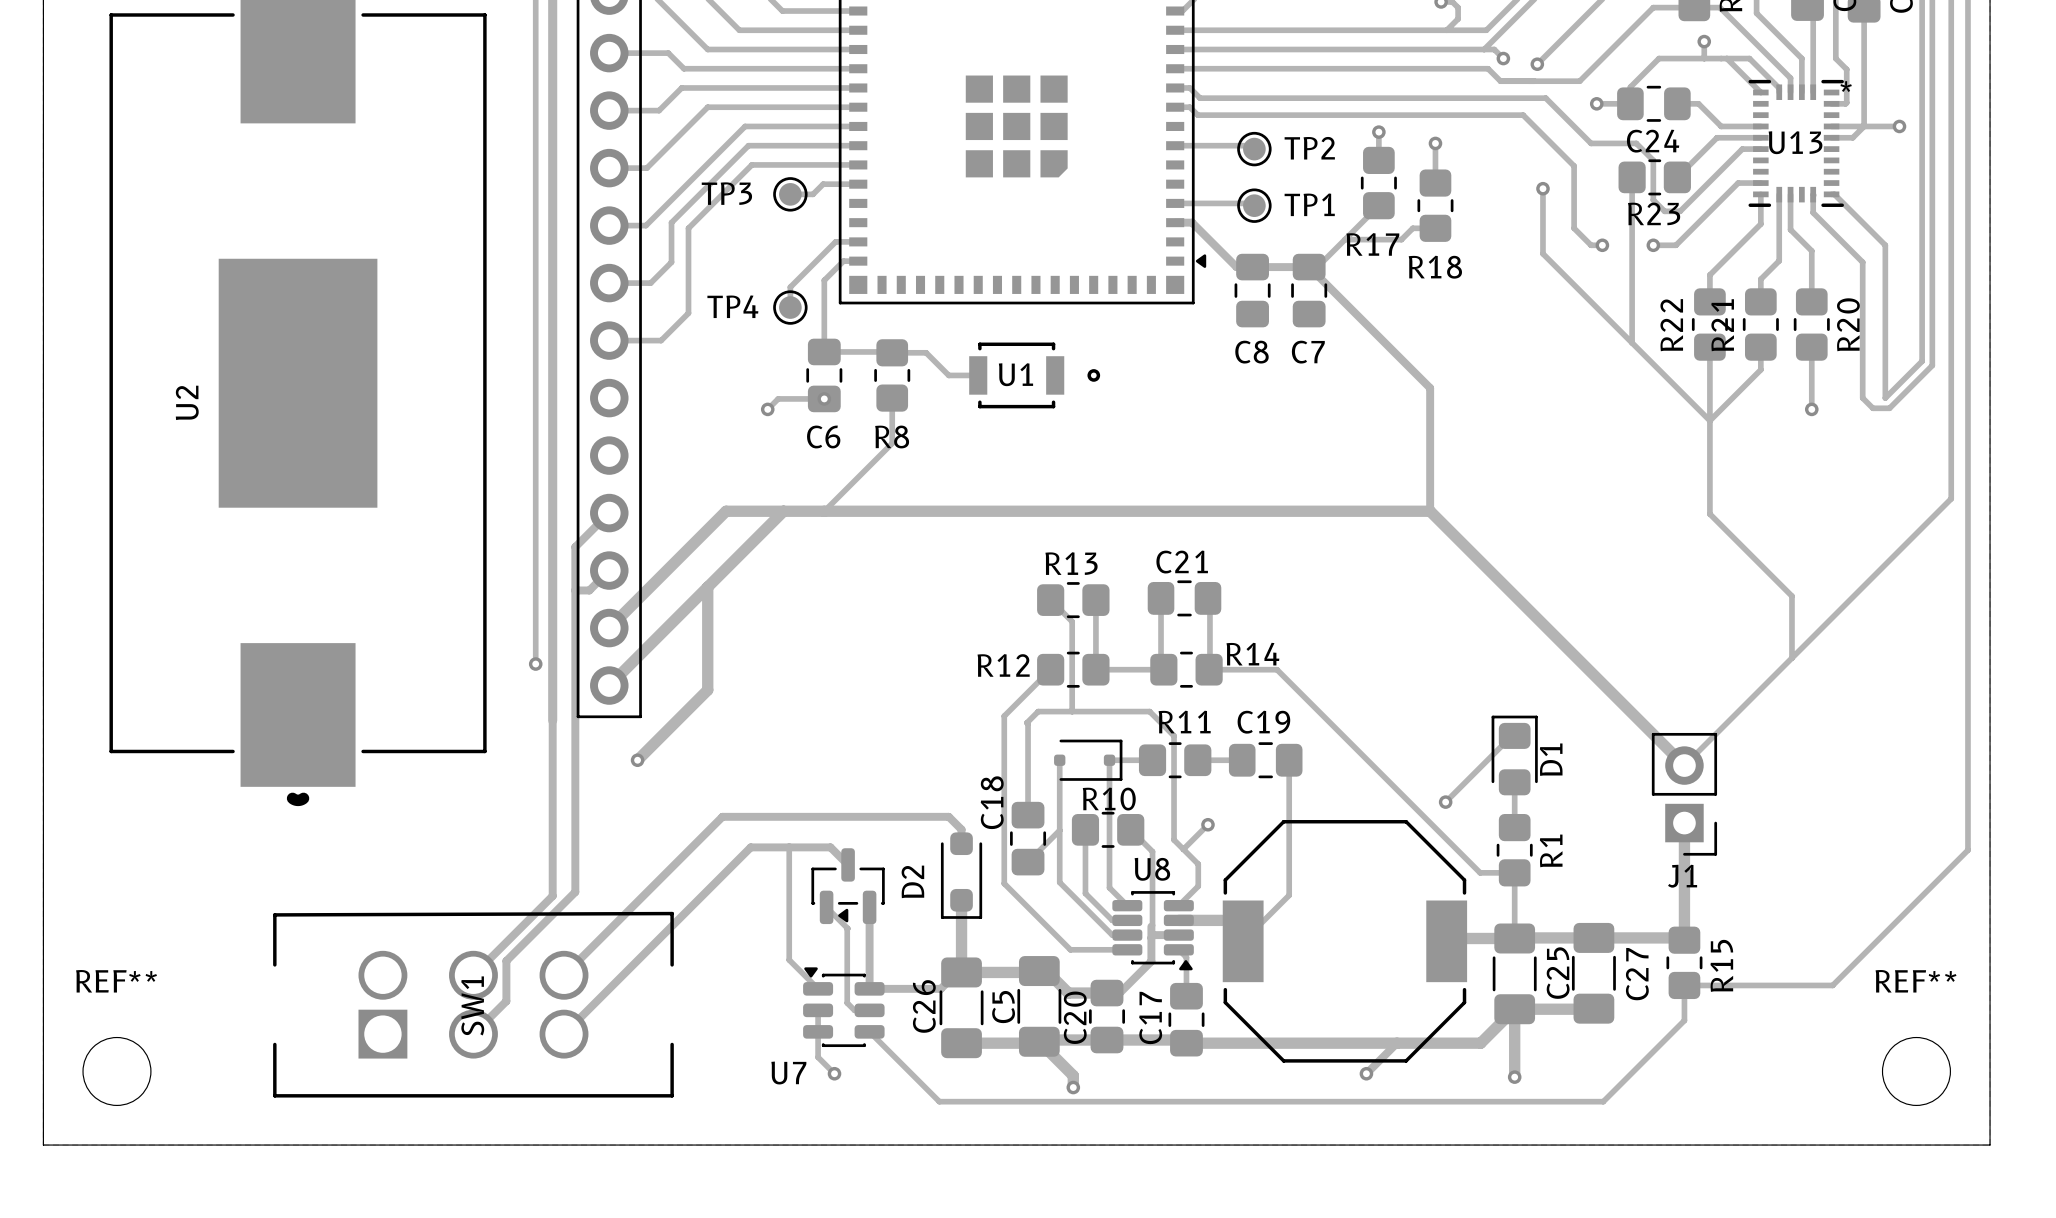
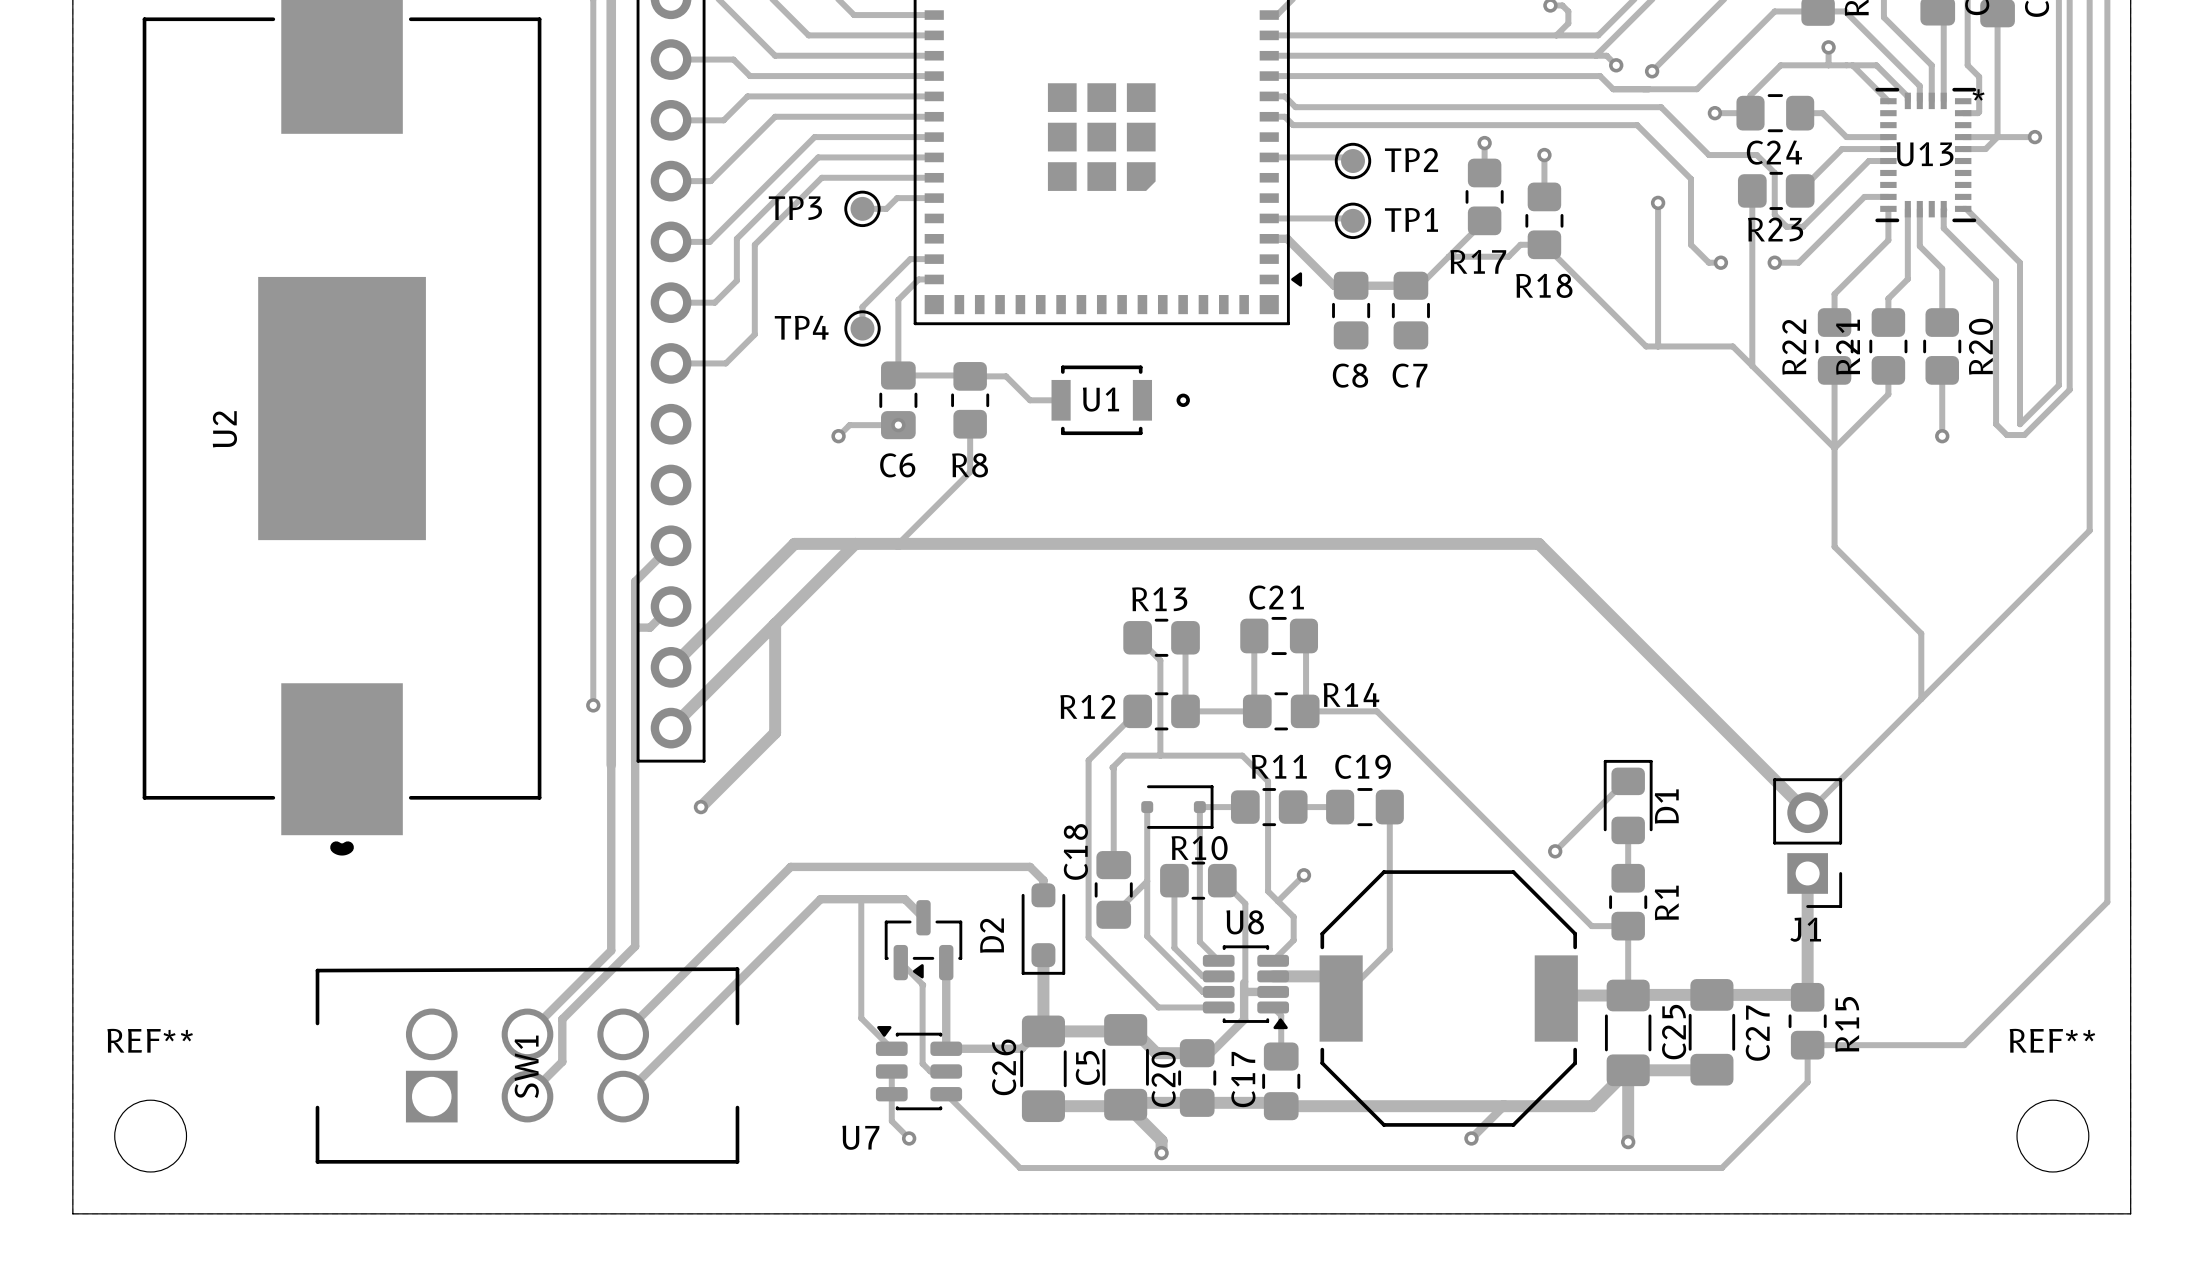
track: none -> (1544, 244) (1646, 346) (1732, 346)
track: (1542, 253) (1613, 324) -> (1658, 271) (1658, 346)
track: (1309, 267) (1430, 388) (1430, 511) -> none

